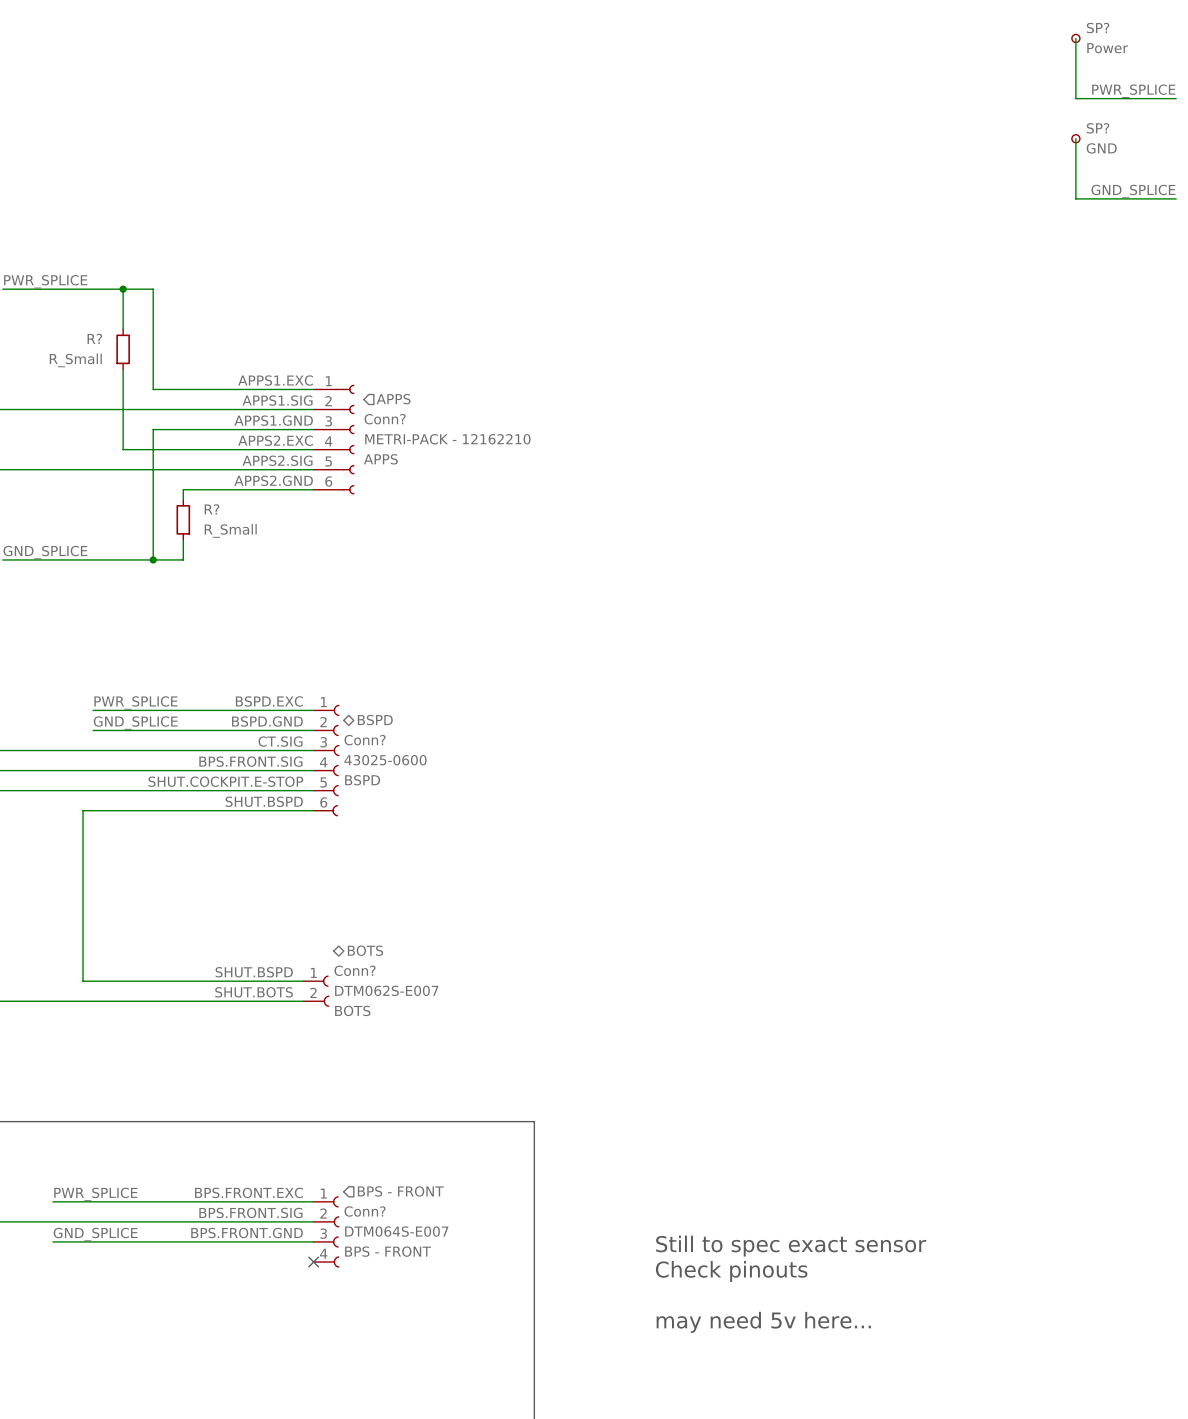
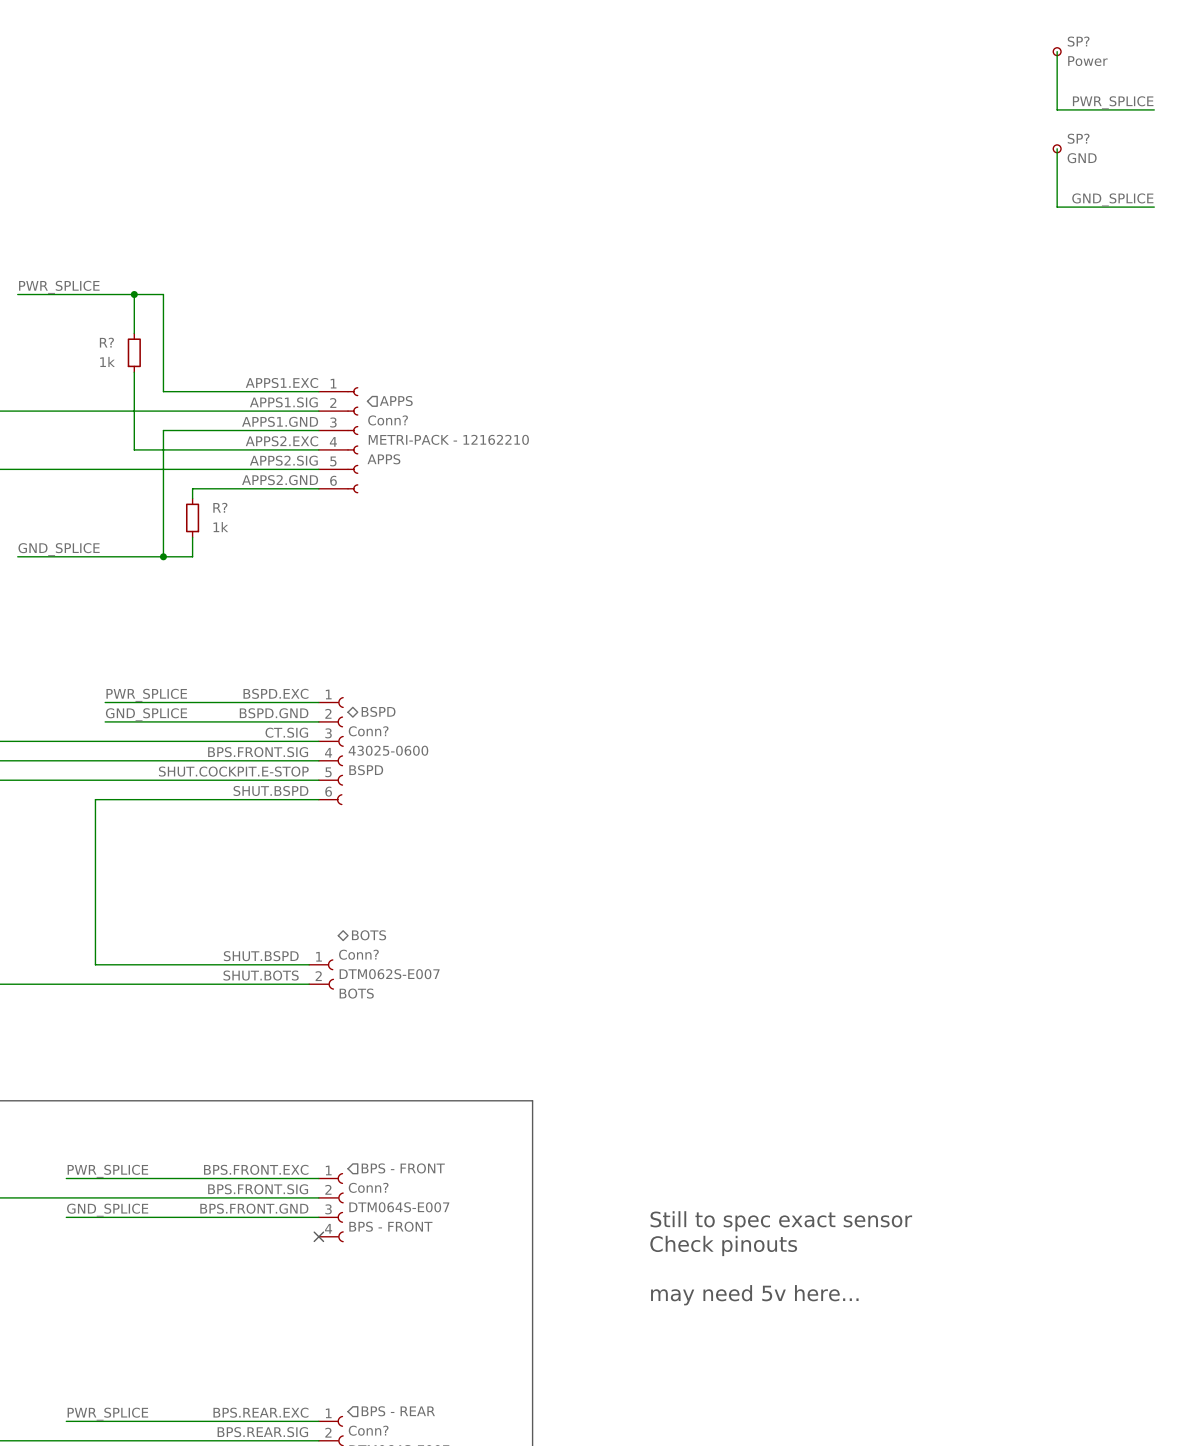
R? value: R_Small (75, 360) -> 1k (107, 361)
R? value: R_Small (230, 530) -> 1k (220, 527)

